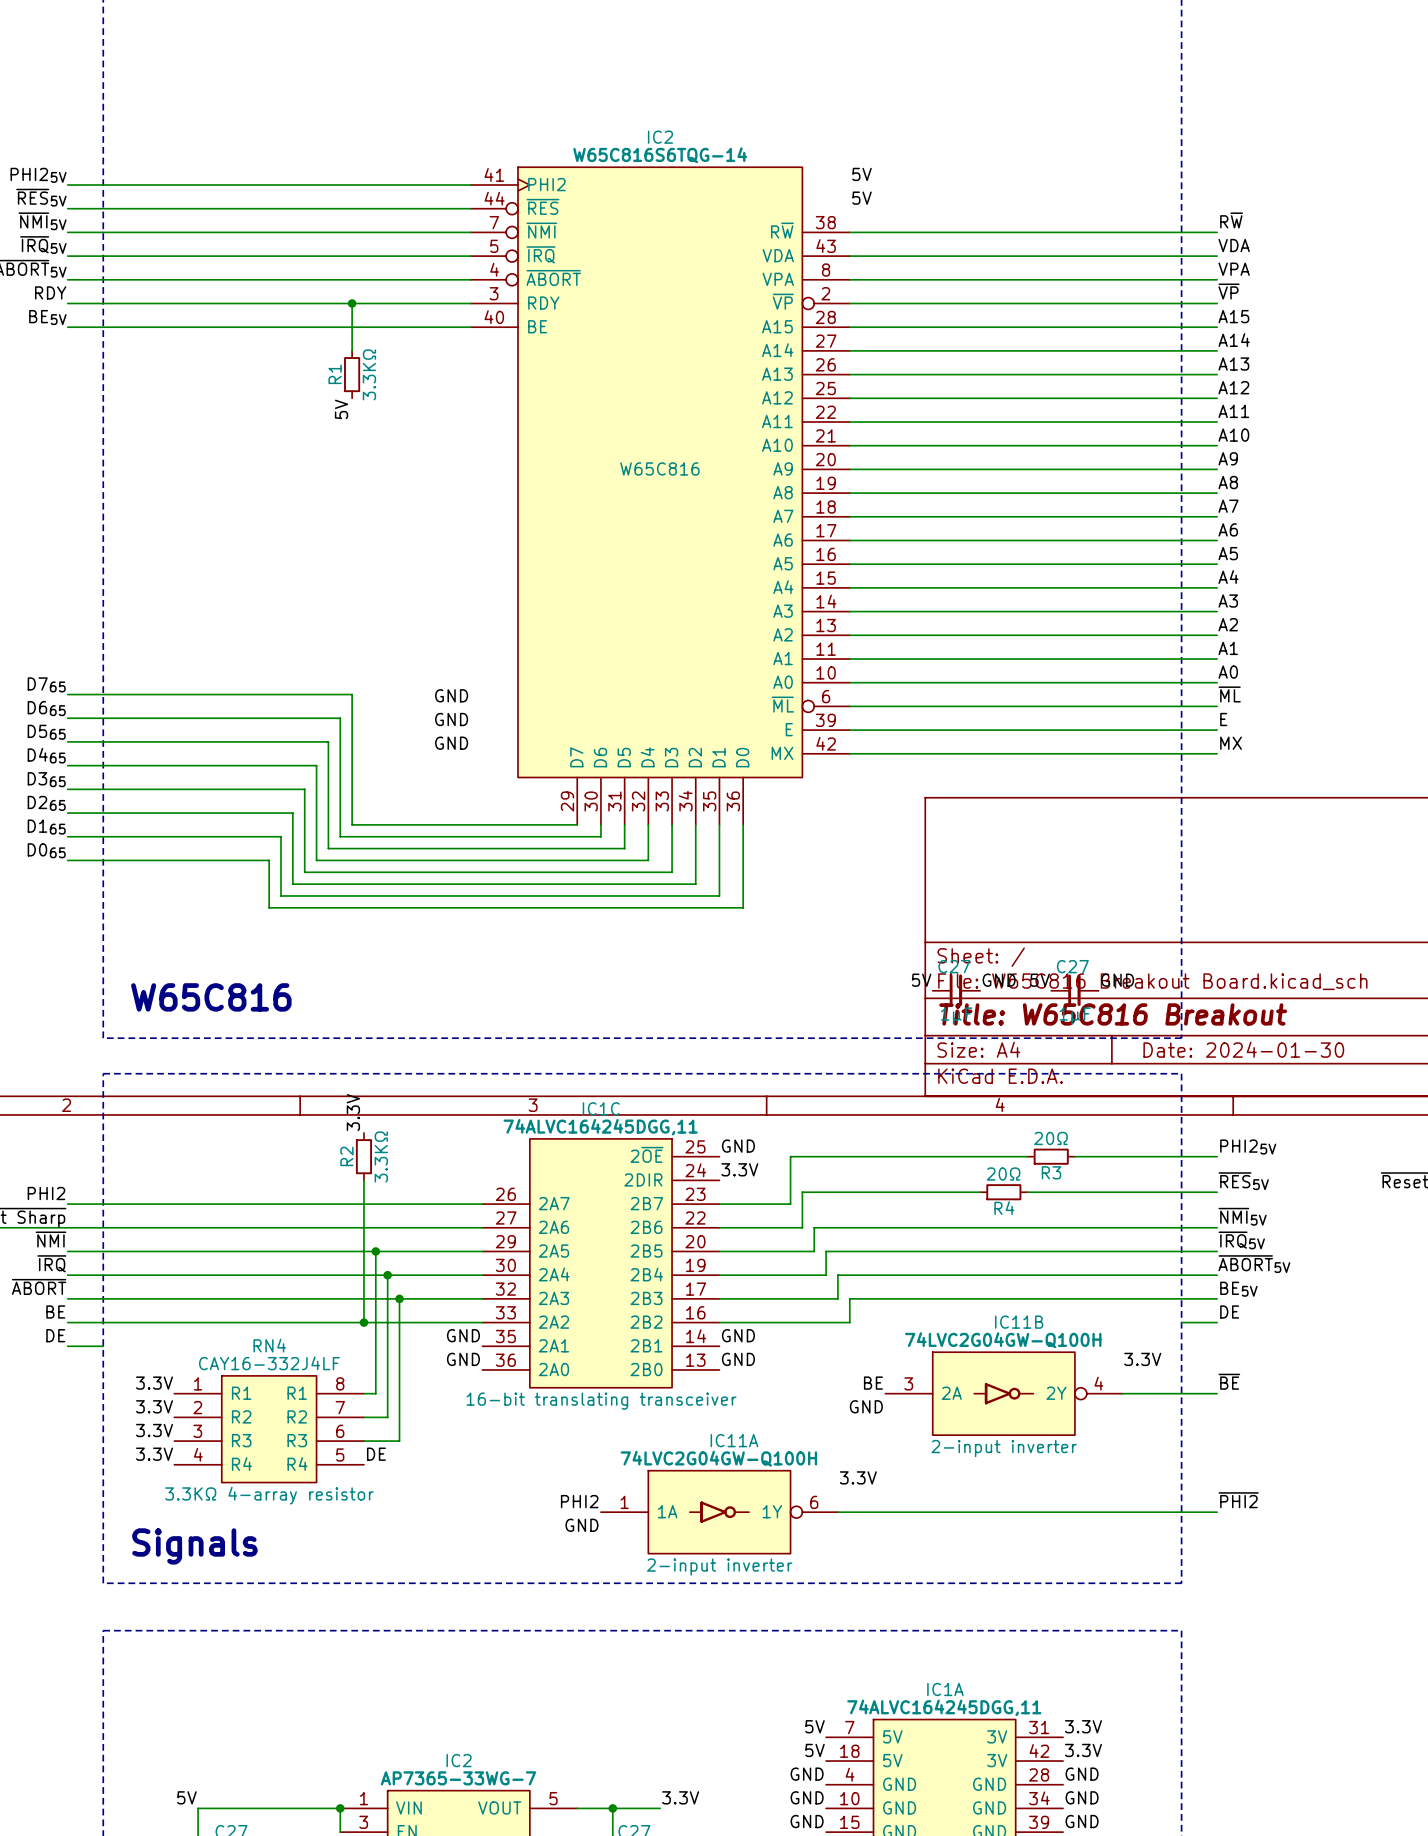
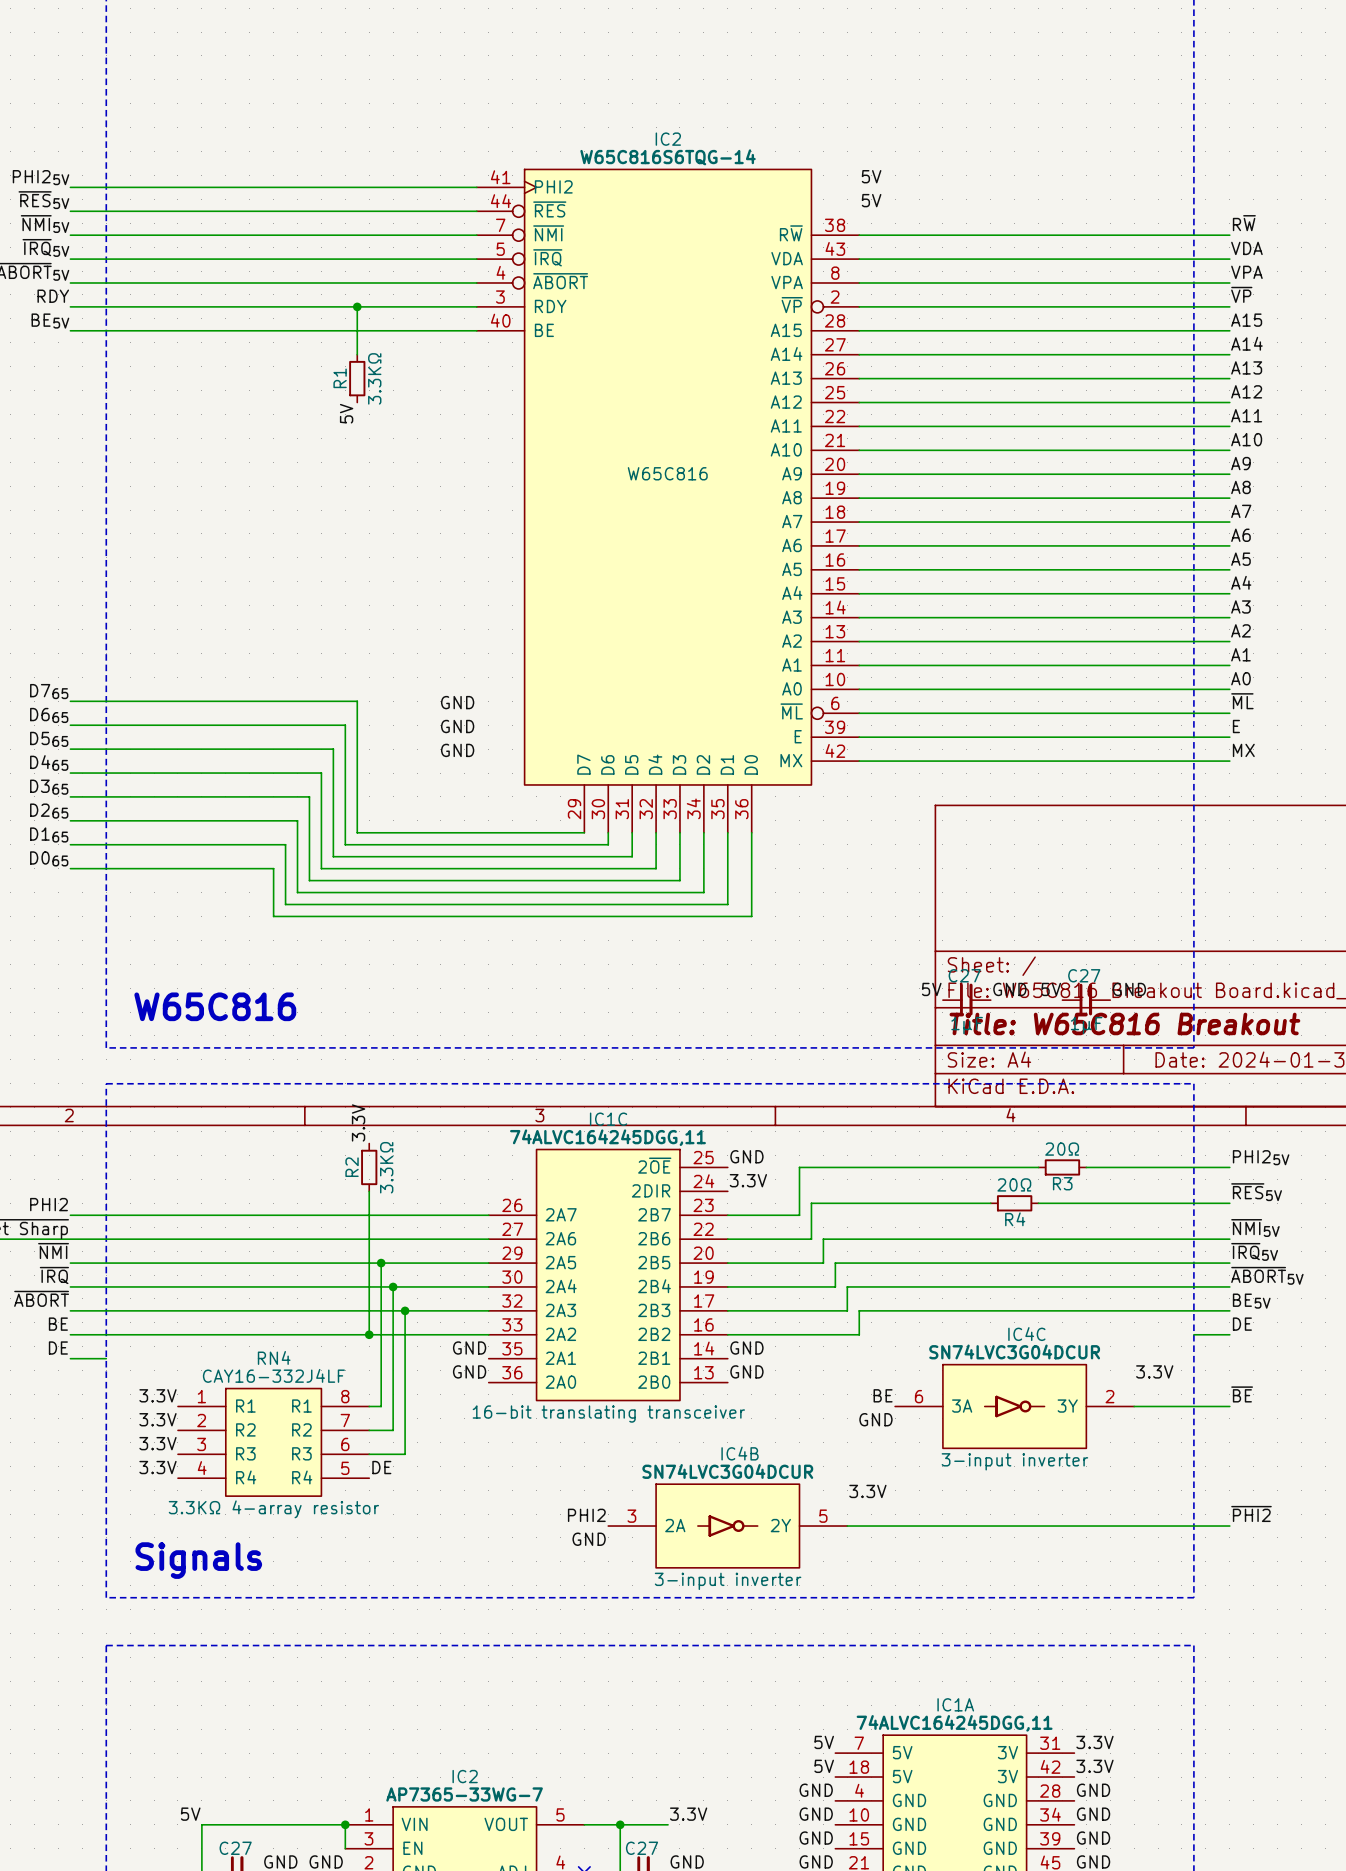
IC11B: 74LVC2G04GW-Q100H (1003, 1393) -> none
IC4C: none -> SN74LVC3G04DCUR (1014, 1406)
IC11A: 74LVC2G04GW-Q100H (719, 1512) -> none
IC4B: none -> SN74LVC3G04DCUR (727, 1526)

